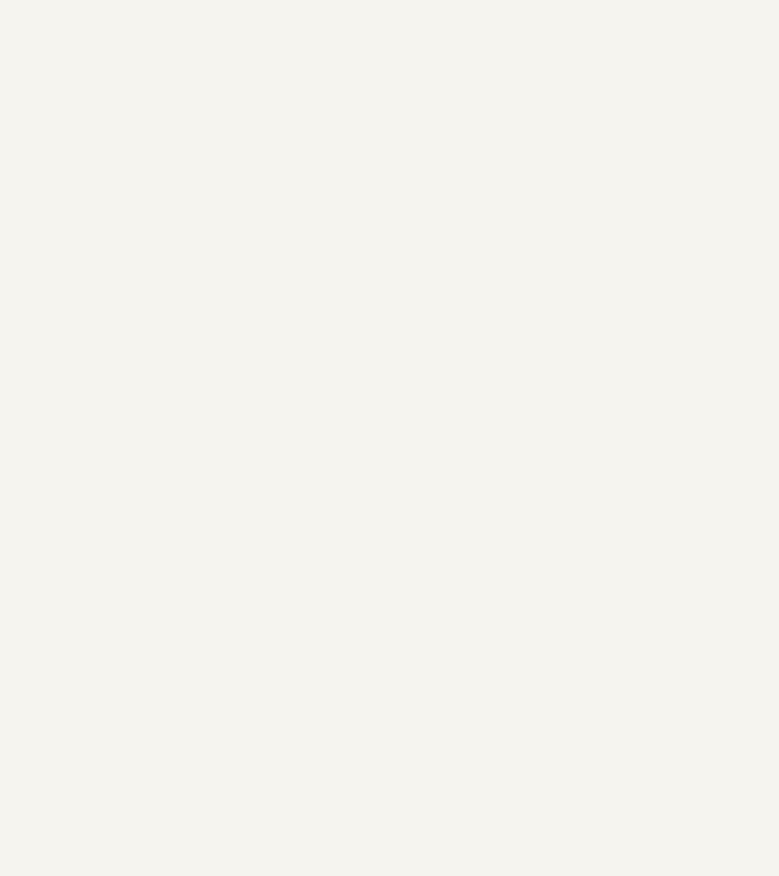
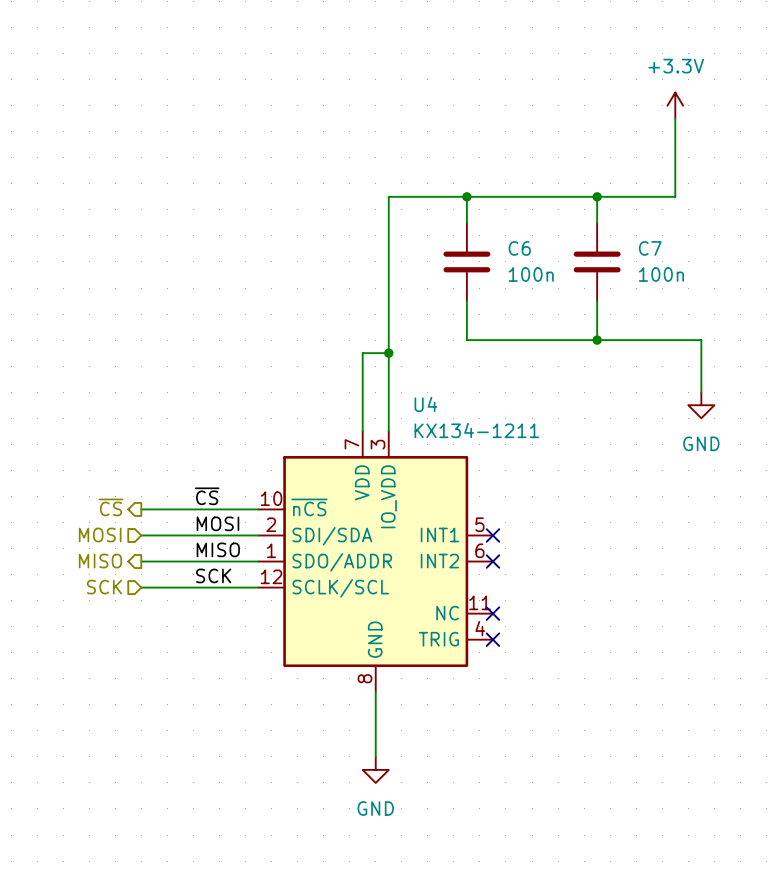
power symbol: none -> +3.3V (675, 105)
wire: none -> (675, 118) (675, 196) (388, 196) (388, 431)
wire: none -> (466, 196) (466, 222)
junction: none -> (466, 196)
wire: none -> (597, 196) (597, 222)
junction: none -> (597, 196)
C6: none -> 100n (466, 261)
C7: none -> 100n (597, 261)
wire: none -> (466, 301) (466, 340) (701, 340) (701, 392)
wire: none -> (597, 301) (597, 340)
junction: none -> (597, 340)
wire: none -> (388, 353) (362, 353) (362, 431)
junction: none -> (388, 353)
power symbol: none -> GND (701, 405)
label: none -> ~{CS} (207, 496)
hierarchical label: none -> ~{CS} (111, 507)
wire: none -> (141, 509) (258, 509)
label: none -> MOSI (217, 523)
hierarchical label: none -> MOSI (100, 534)
wire: none -> (141, 535) (258, 535)
no-connect mark: none -> (492, 535)
label: none -> MISO (218, 549)
hierarchical label: none -> MISO (100, 561)
wire: none -> (141, 561) (258, 561)
U4: none -> KX134-1211 (375, 561)
no-connect mark: none -> (492, 561)
label: none -> SCK (213, 575)
hierarchical label: none -> SCK (104, 587)
wire: none -> (141, 587) (258, 587)
no-connect mark: none -> (492, 613)
no-connect mark: none -> (492, 639)
wire: none -> (375, 691) (375, 756)
power symbol: none -> GND (375, 769)

